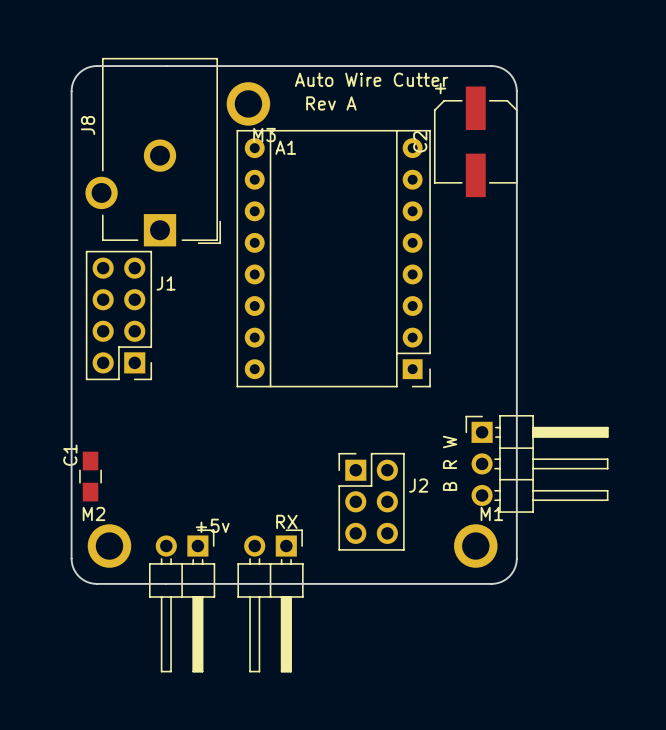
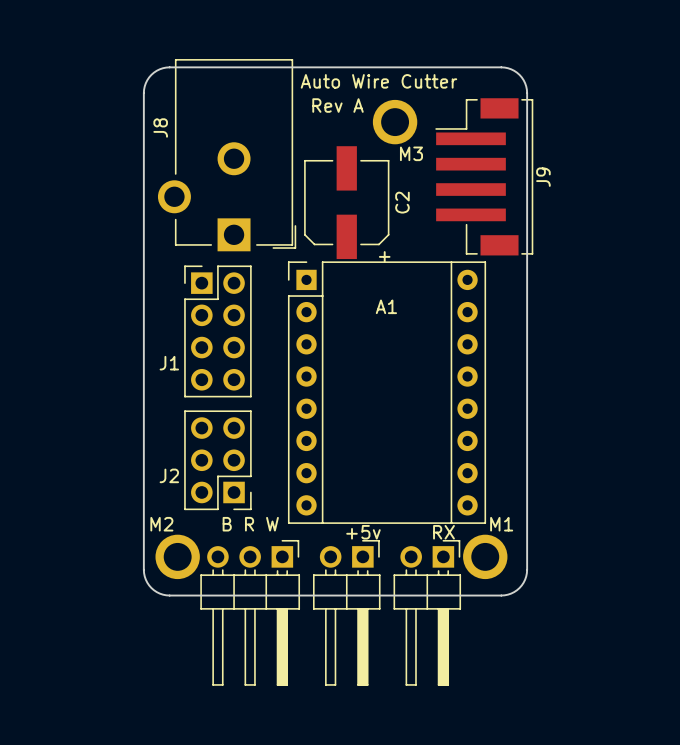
board edge: (166, 66) (90, 66) (76, 75) (71, 91) (71, 561) (76, 574) (90, 583) (166, 583) -> (169, 67) (159, 69) (151, 74) (145, 83) (143, 93) (143, 569) (145, 579) (151, 587) (159, 593) (169, 595)
M3 position: (248, 103) -> (395, 122)
C2 rotation: 0° (475, 141) -> 180° (346, 202)
C2 position: (475, 141) -> (346, 202)
A1 name position: A1 (285, 147) -> A1 (386, 306)
J8 position: (153, 152) -> (227, 155)
J9: none -> (484, 176)
A1 rotation: 0° (333, 258) -> 180° (387, 392)
J1 rotation: 0° (118, 315) -> 180° (217, 331)
J1 position: (118, 315) -> (217, 331)
B R W: (536, 463) -> none
C1: (90, 476) -> none
J2 rotation: 0° (371, 501) -> 180° (217, 460)
J2 position: (371, 501) -> (217, 460)
+5v name position: +5v (212, 525) -> +5v (363, 532)
M2 position: (109, 546) -> (177, 556)
+5v position: (182, 600) -> (346, 612)
B R W: none -> (250, 612)
RX position: (270, 600) -> (427, 612)

